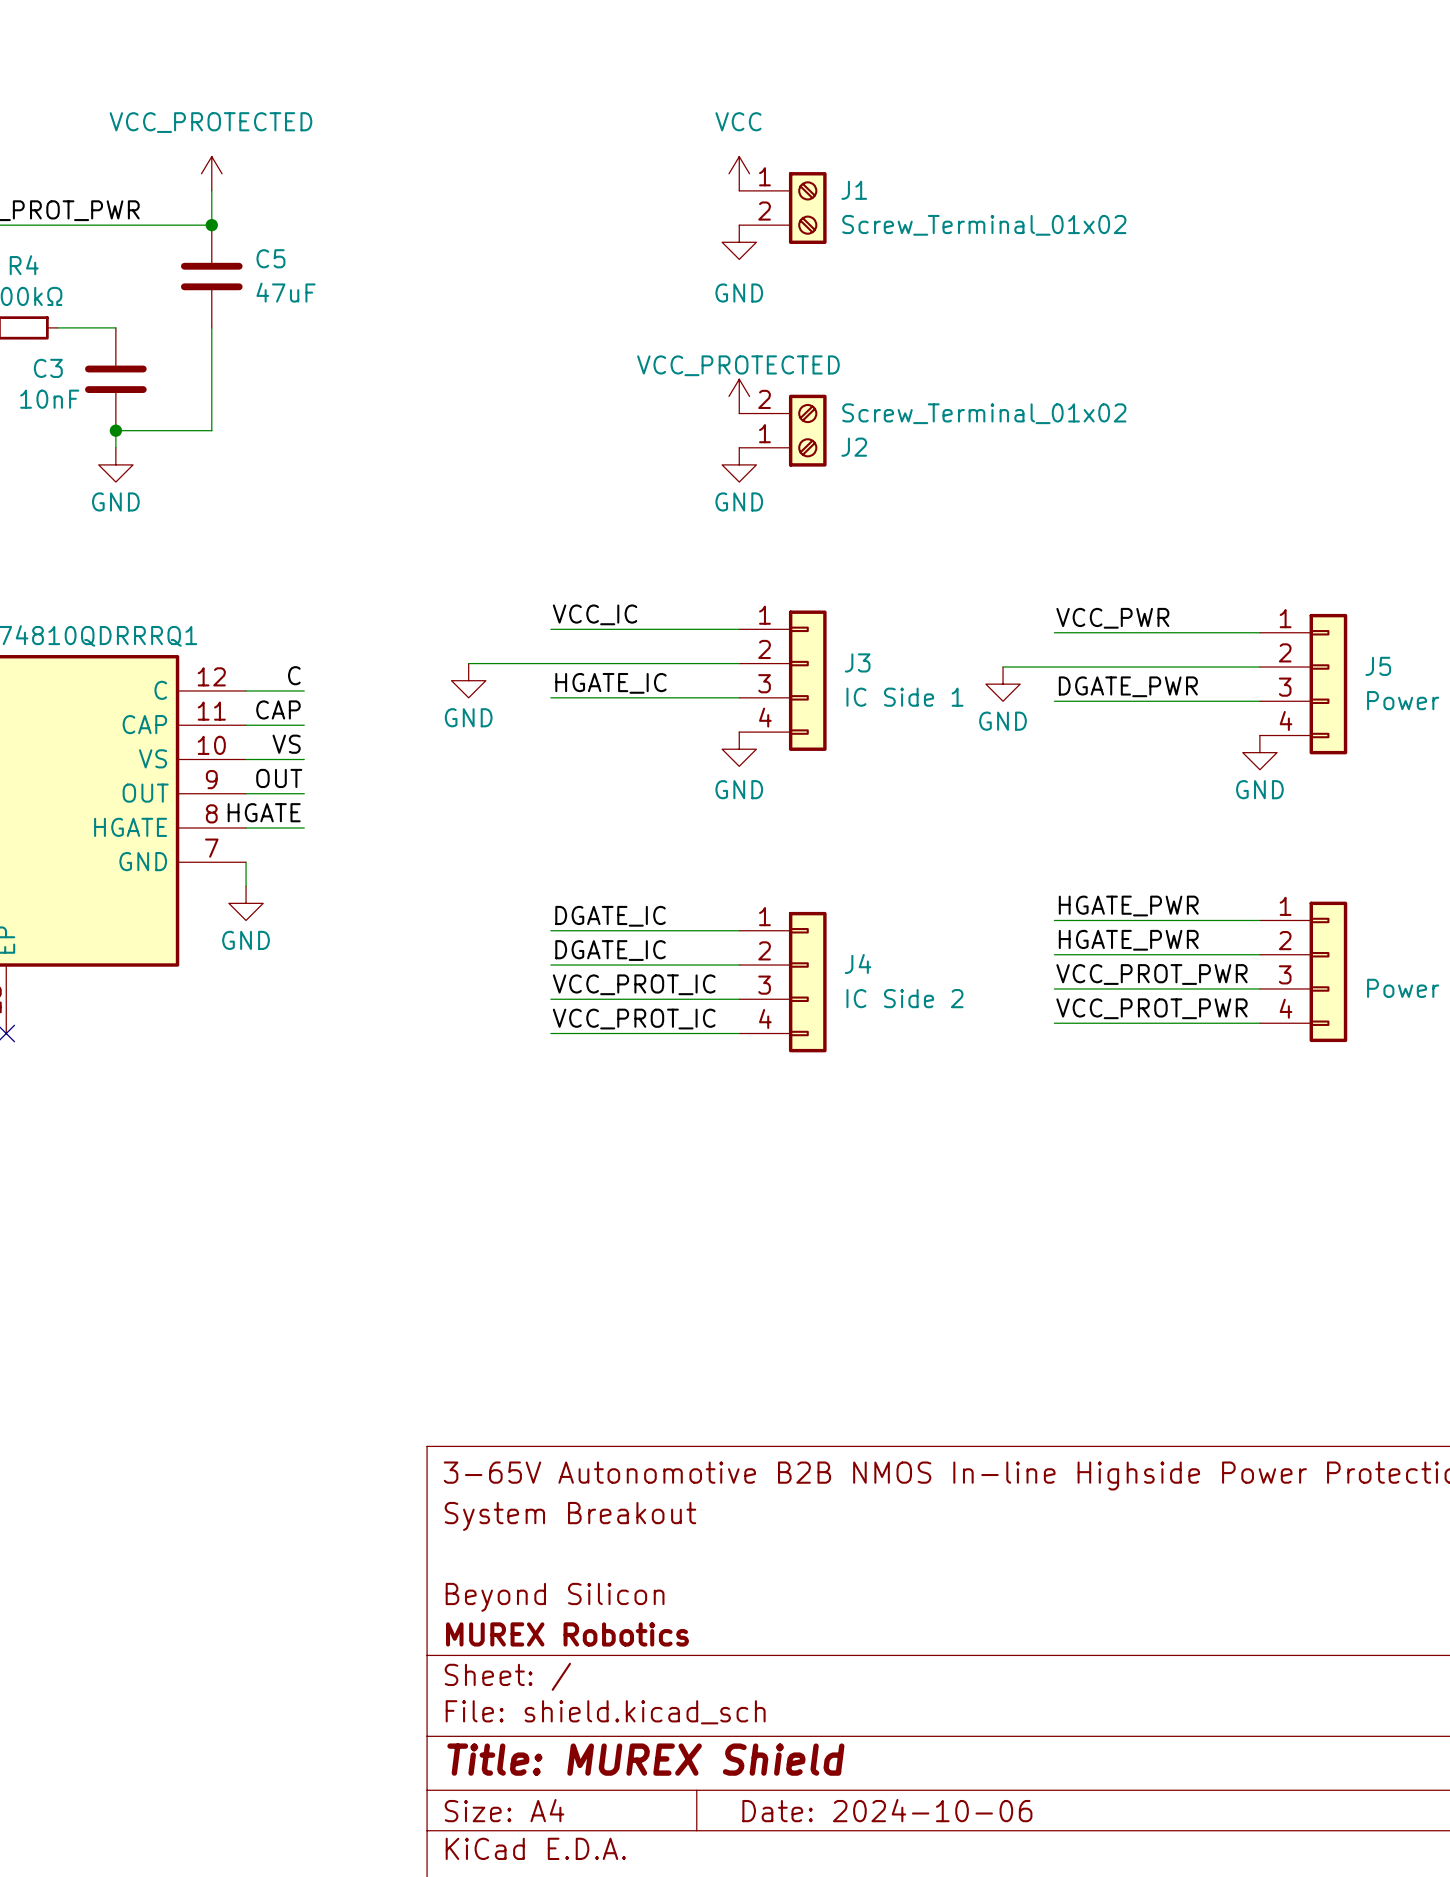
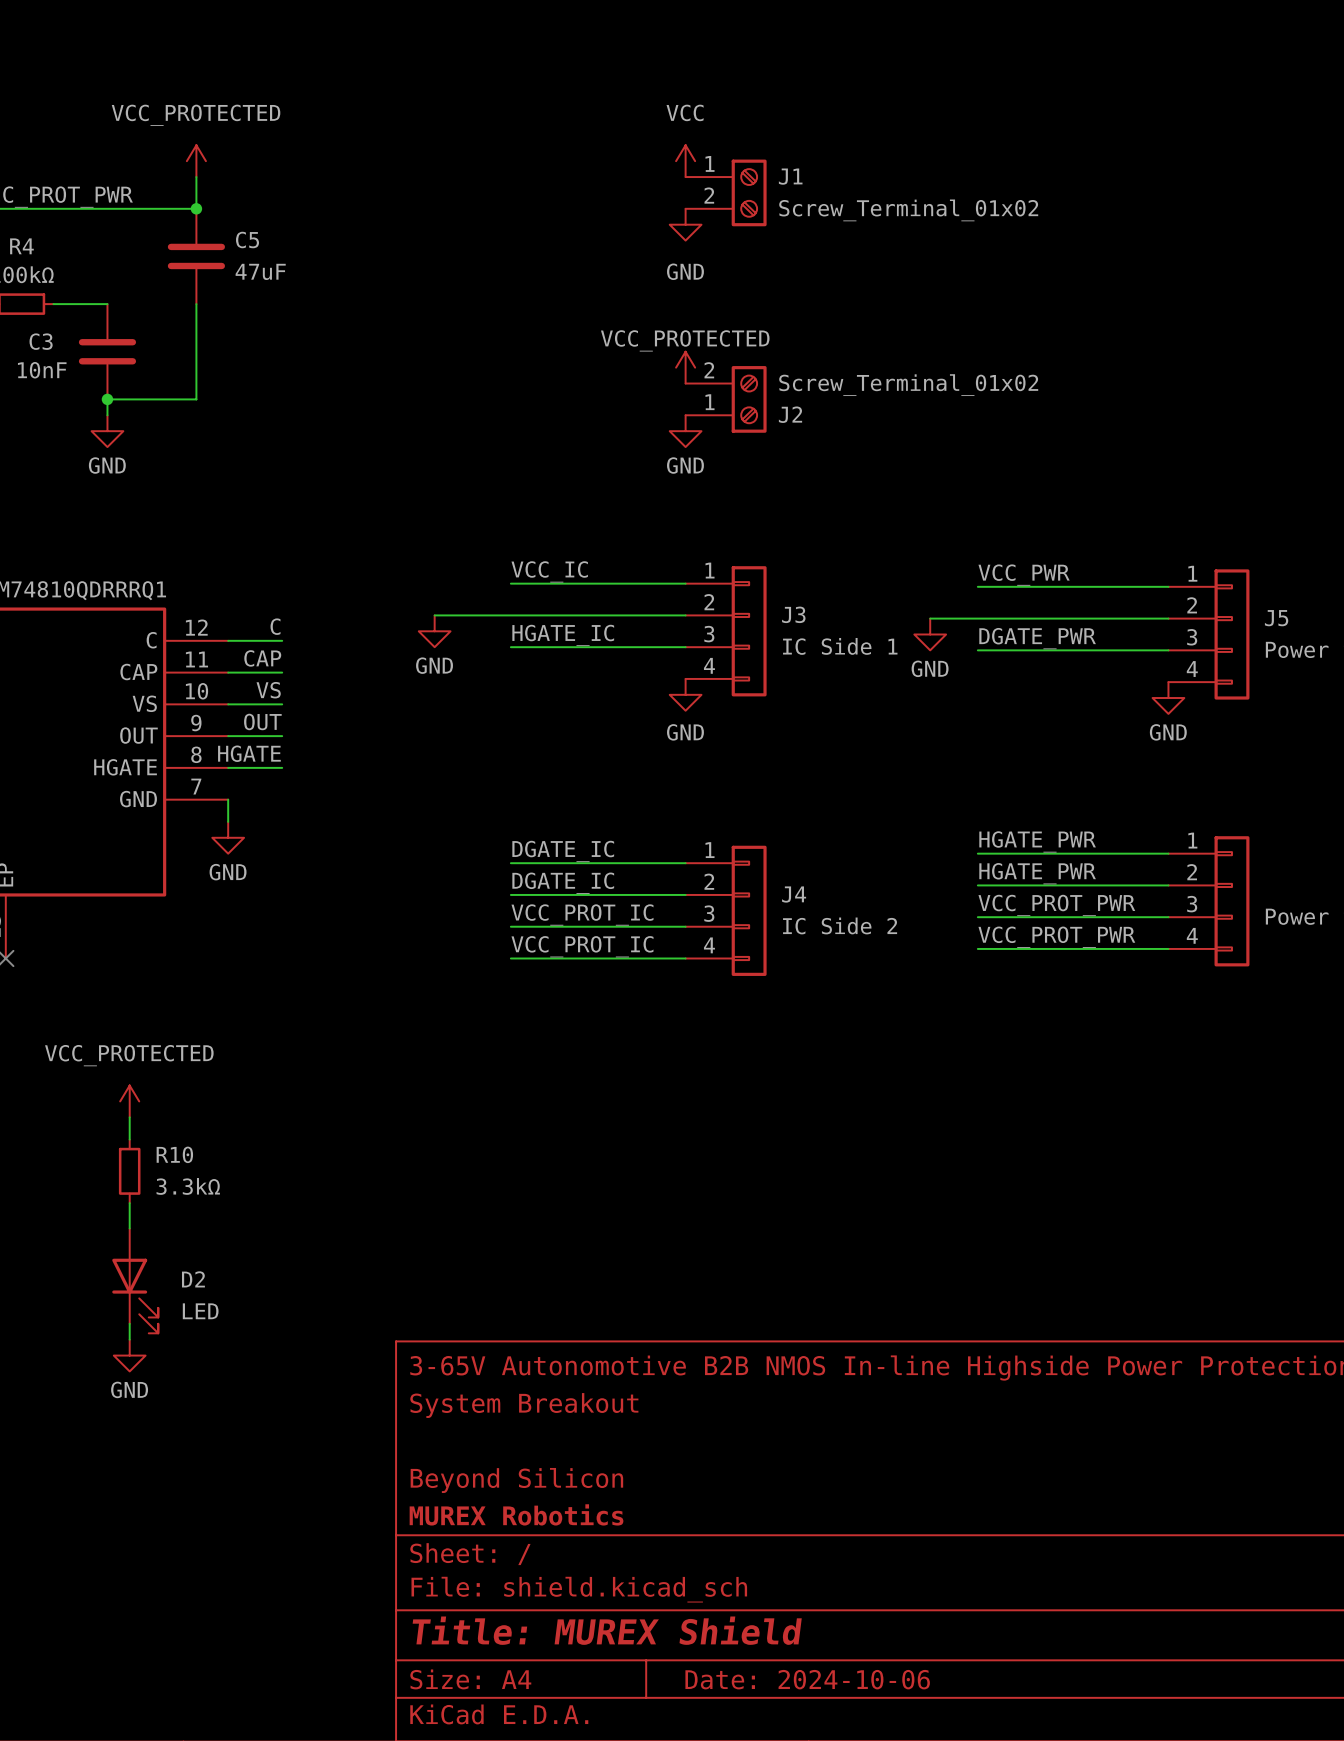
power symbol: none -> VCC_PROTECTED (129, 1101)
wire: none -> (129, 1117) (129, 1139)
R10: none -> 3.3kΩ (129, 1171)
wire: none -> (129, 1203) (129, 1228)
D2: none -> LED (135, 1280)
wire: none -> (129, 1323) (129, 1339)
power symbol: none -> GND (129, 1355)

